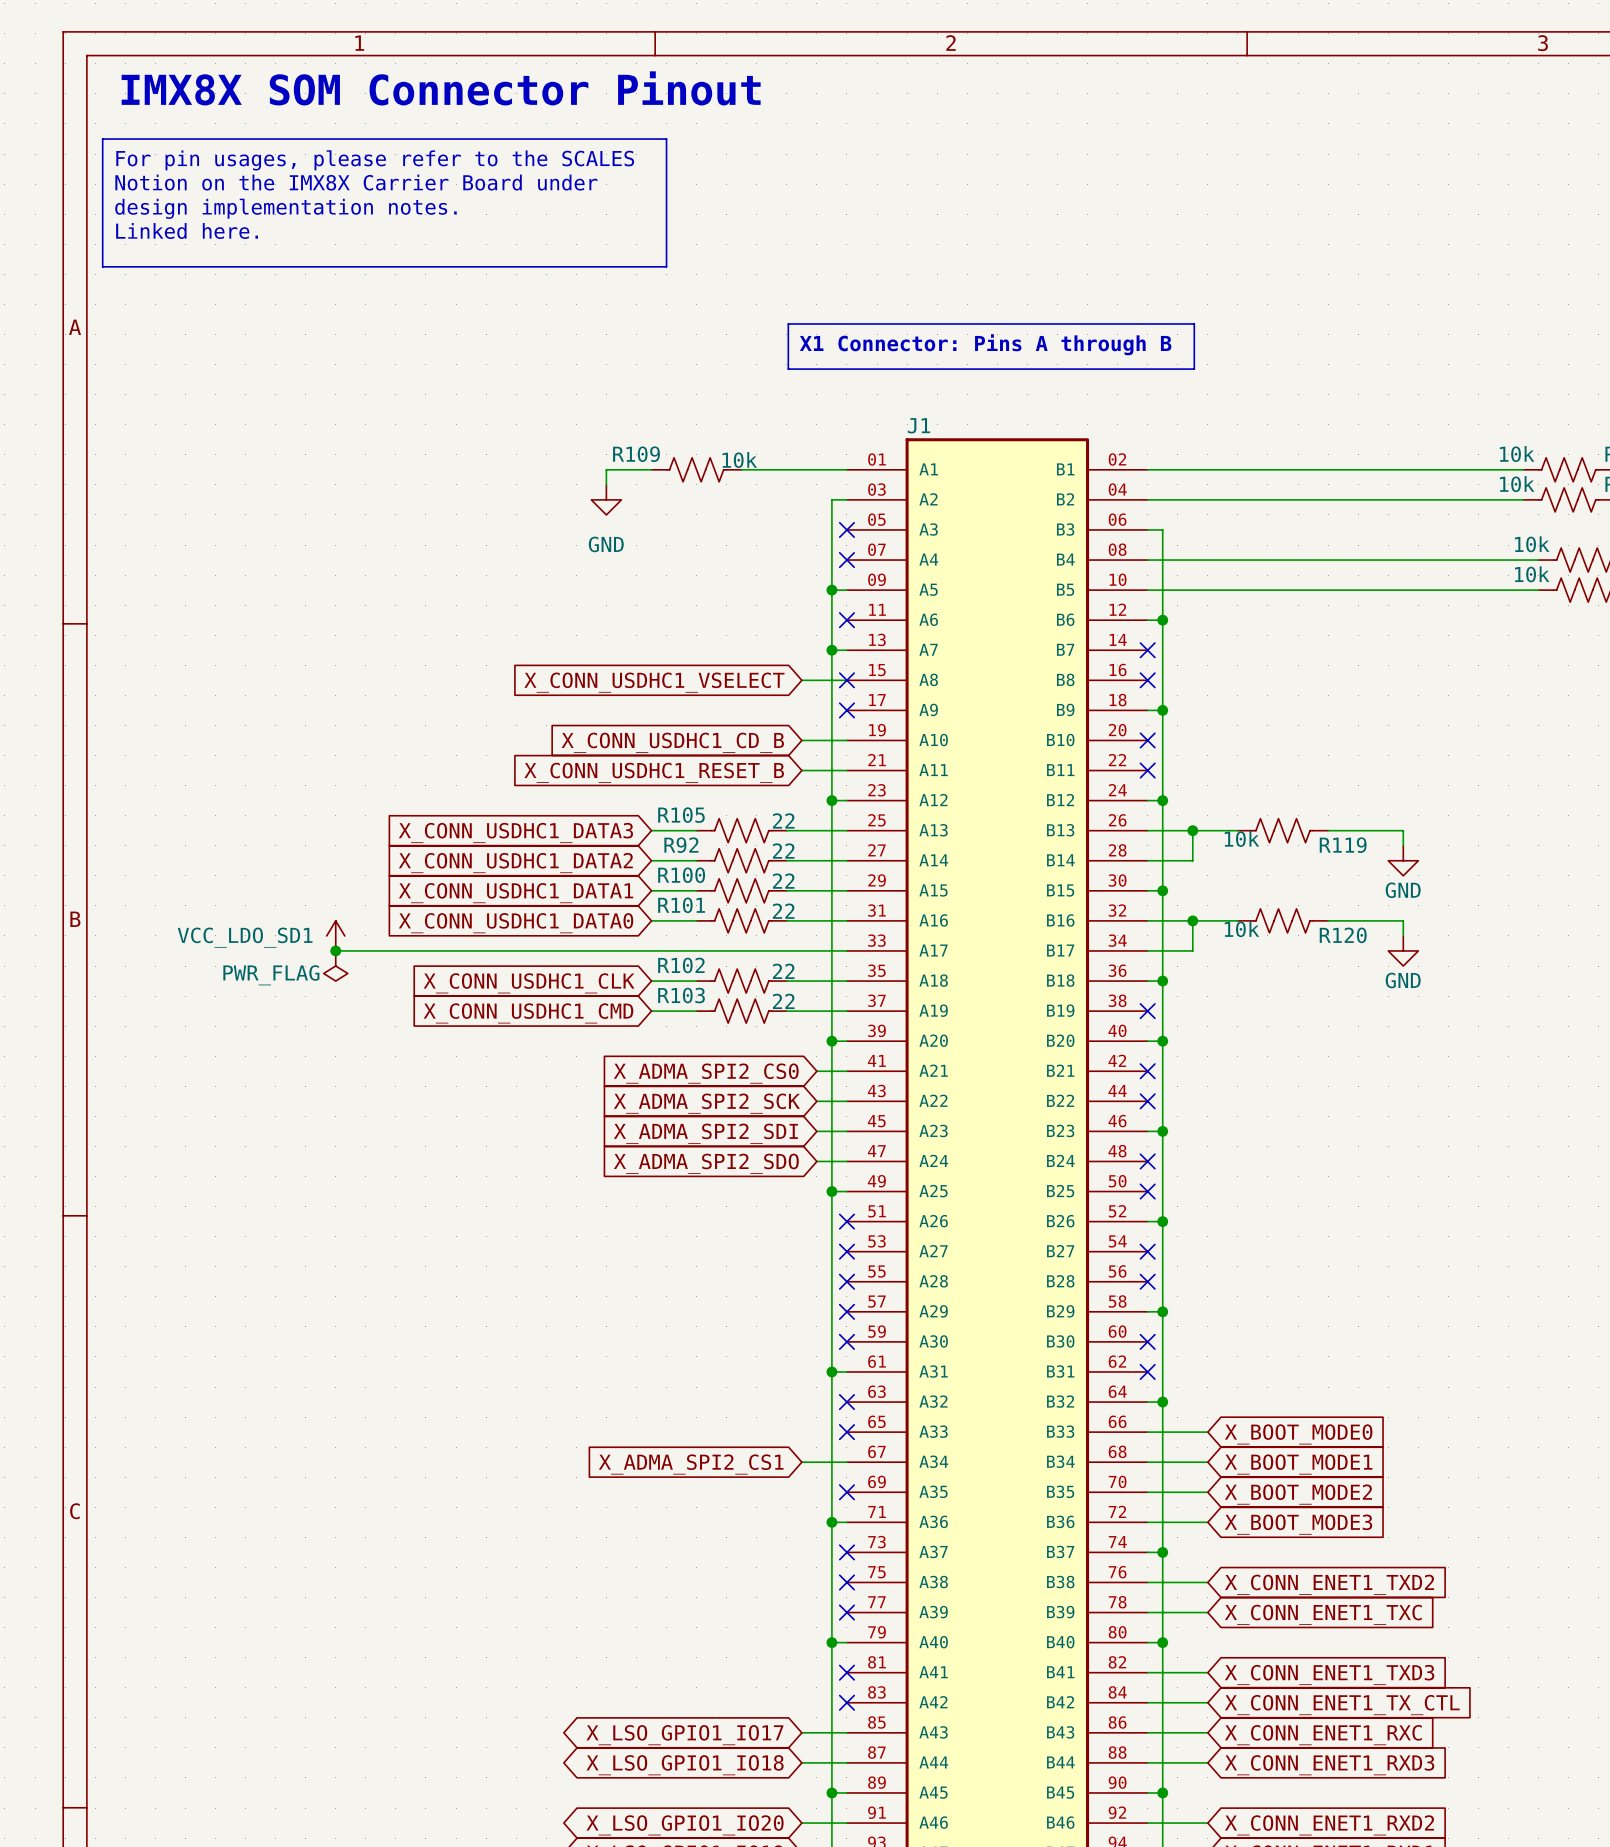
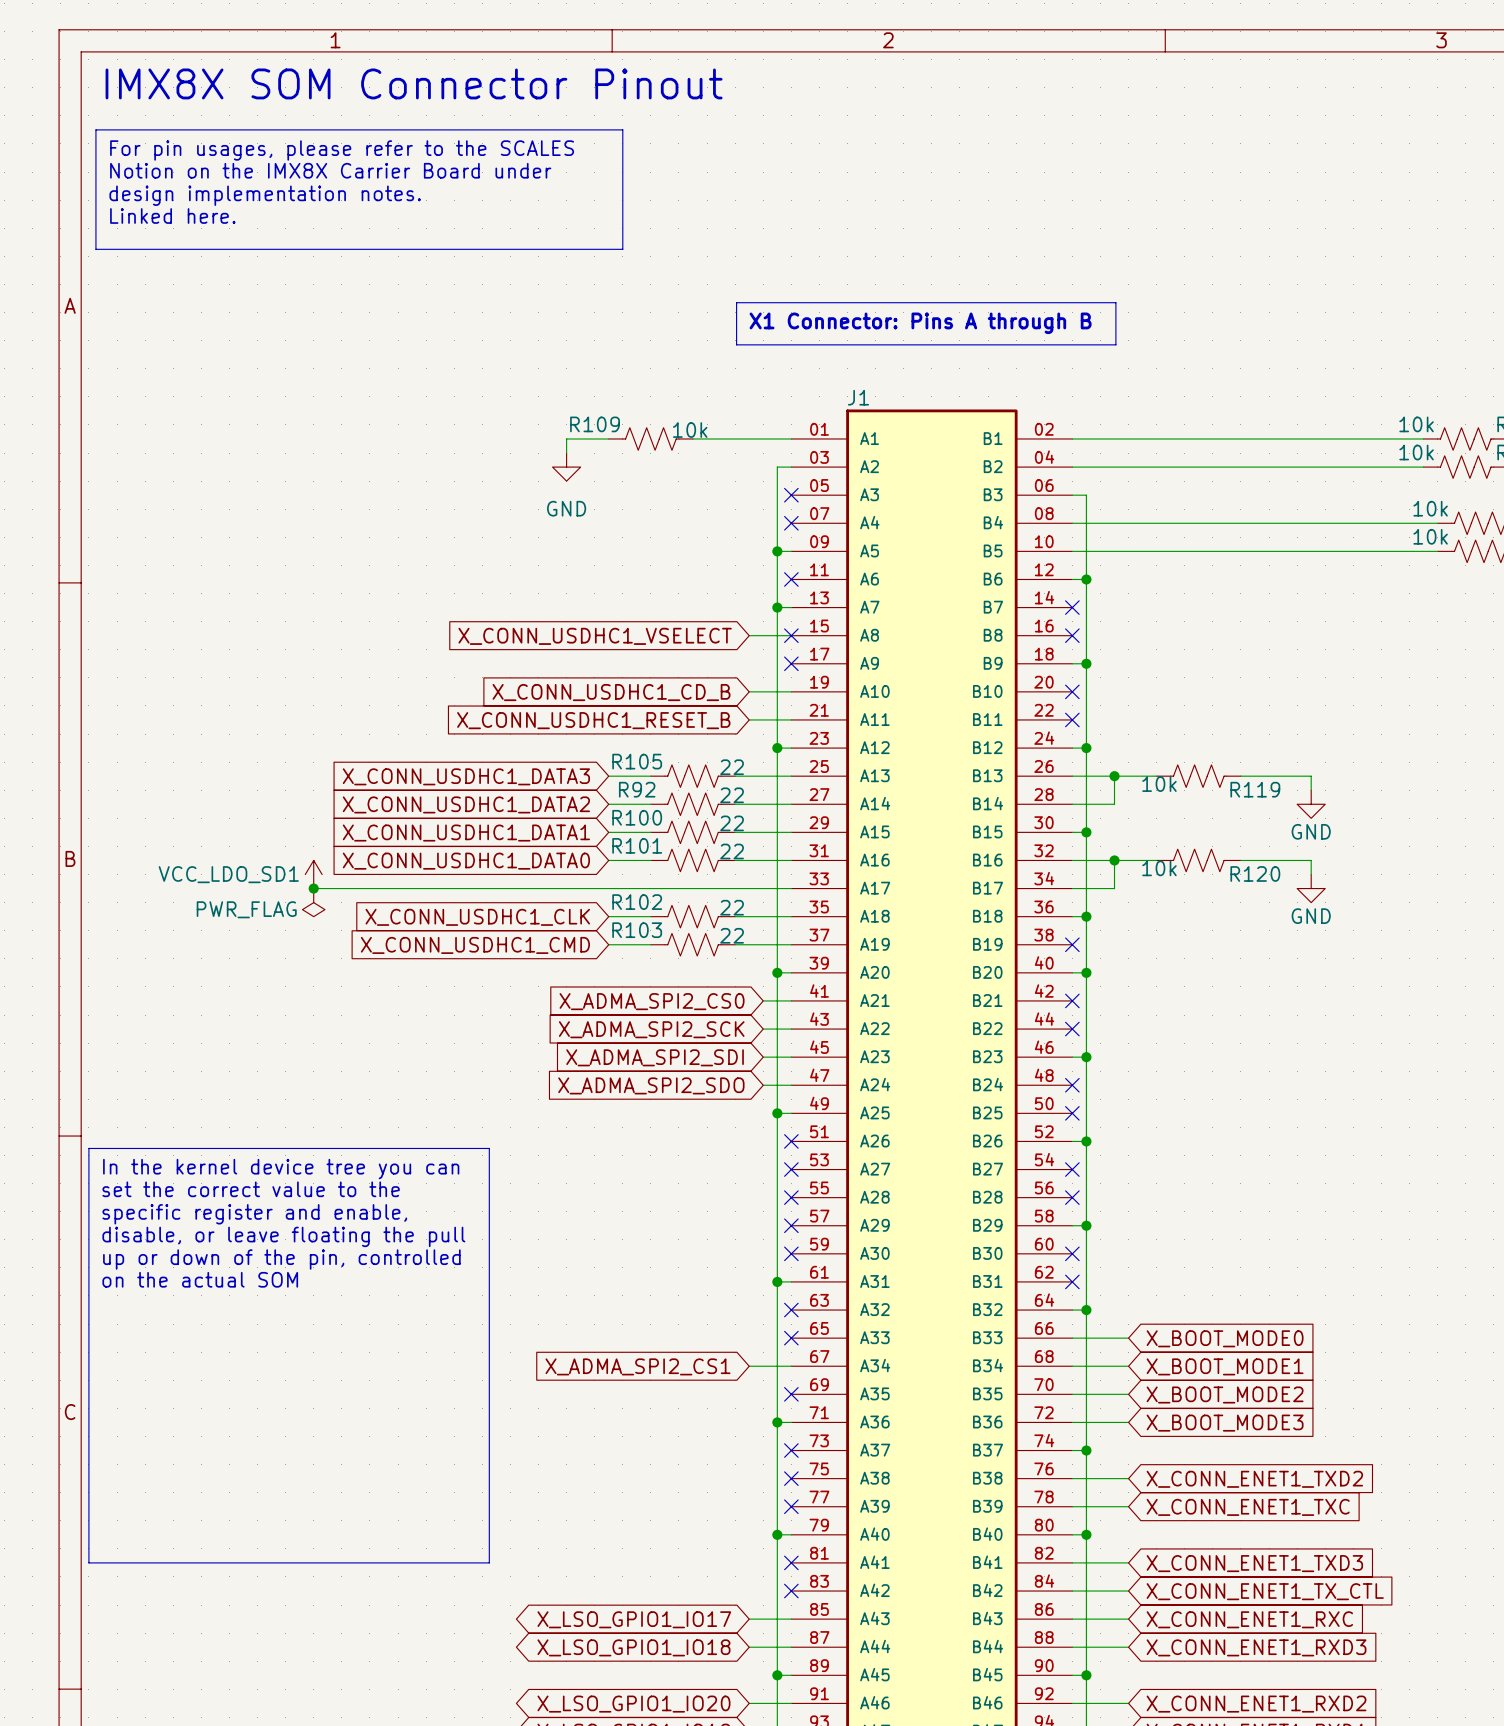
line: none -> (88, 1148) (489, 1148) (489, 1562) (88, 1562) (88, 1148)
text: none -> In the kernel device tree you can (281, 1169)
text: none -> set the correct value to the (251, 1189)
text: none -> specific register and enable, (254, 1214)
text: none -> disable, or leave floating the pull (283, 1236)
text: none -> up or down of the pin, controlled (281, 1259)
text: none -> on the actual SOM (200, 1279)

